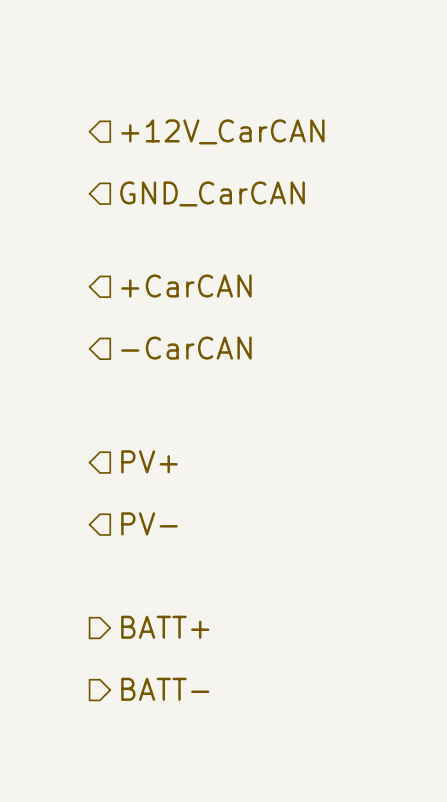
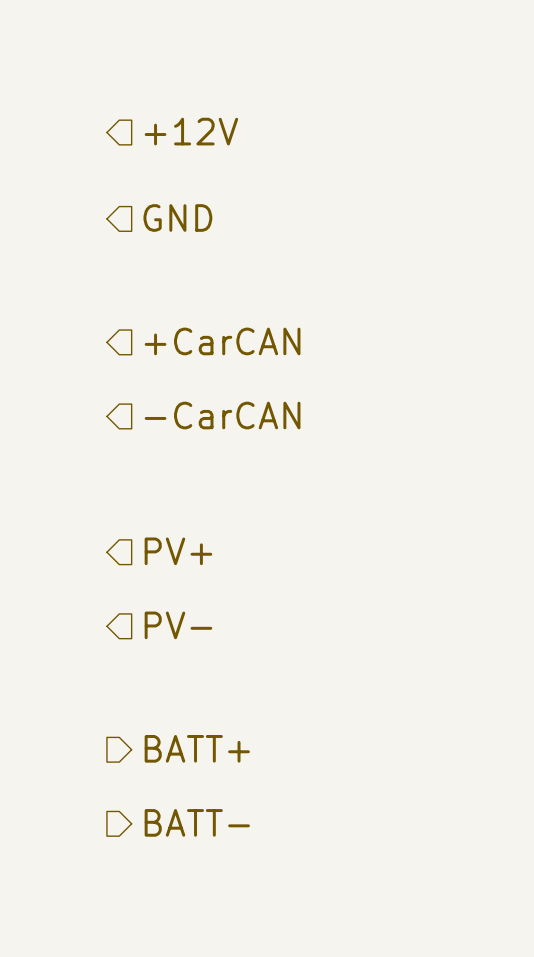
hierarchical label: none -> +12V (191, 131)
hierarchical label: +12V_CarCAN (222, 131) -> none
hierarchical label: GND_CarCAN (212, 193) -> GND (177, 218)

